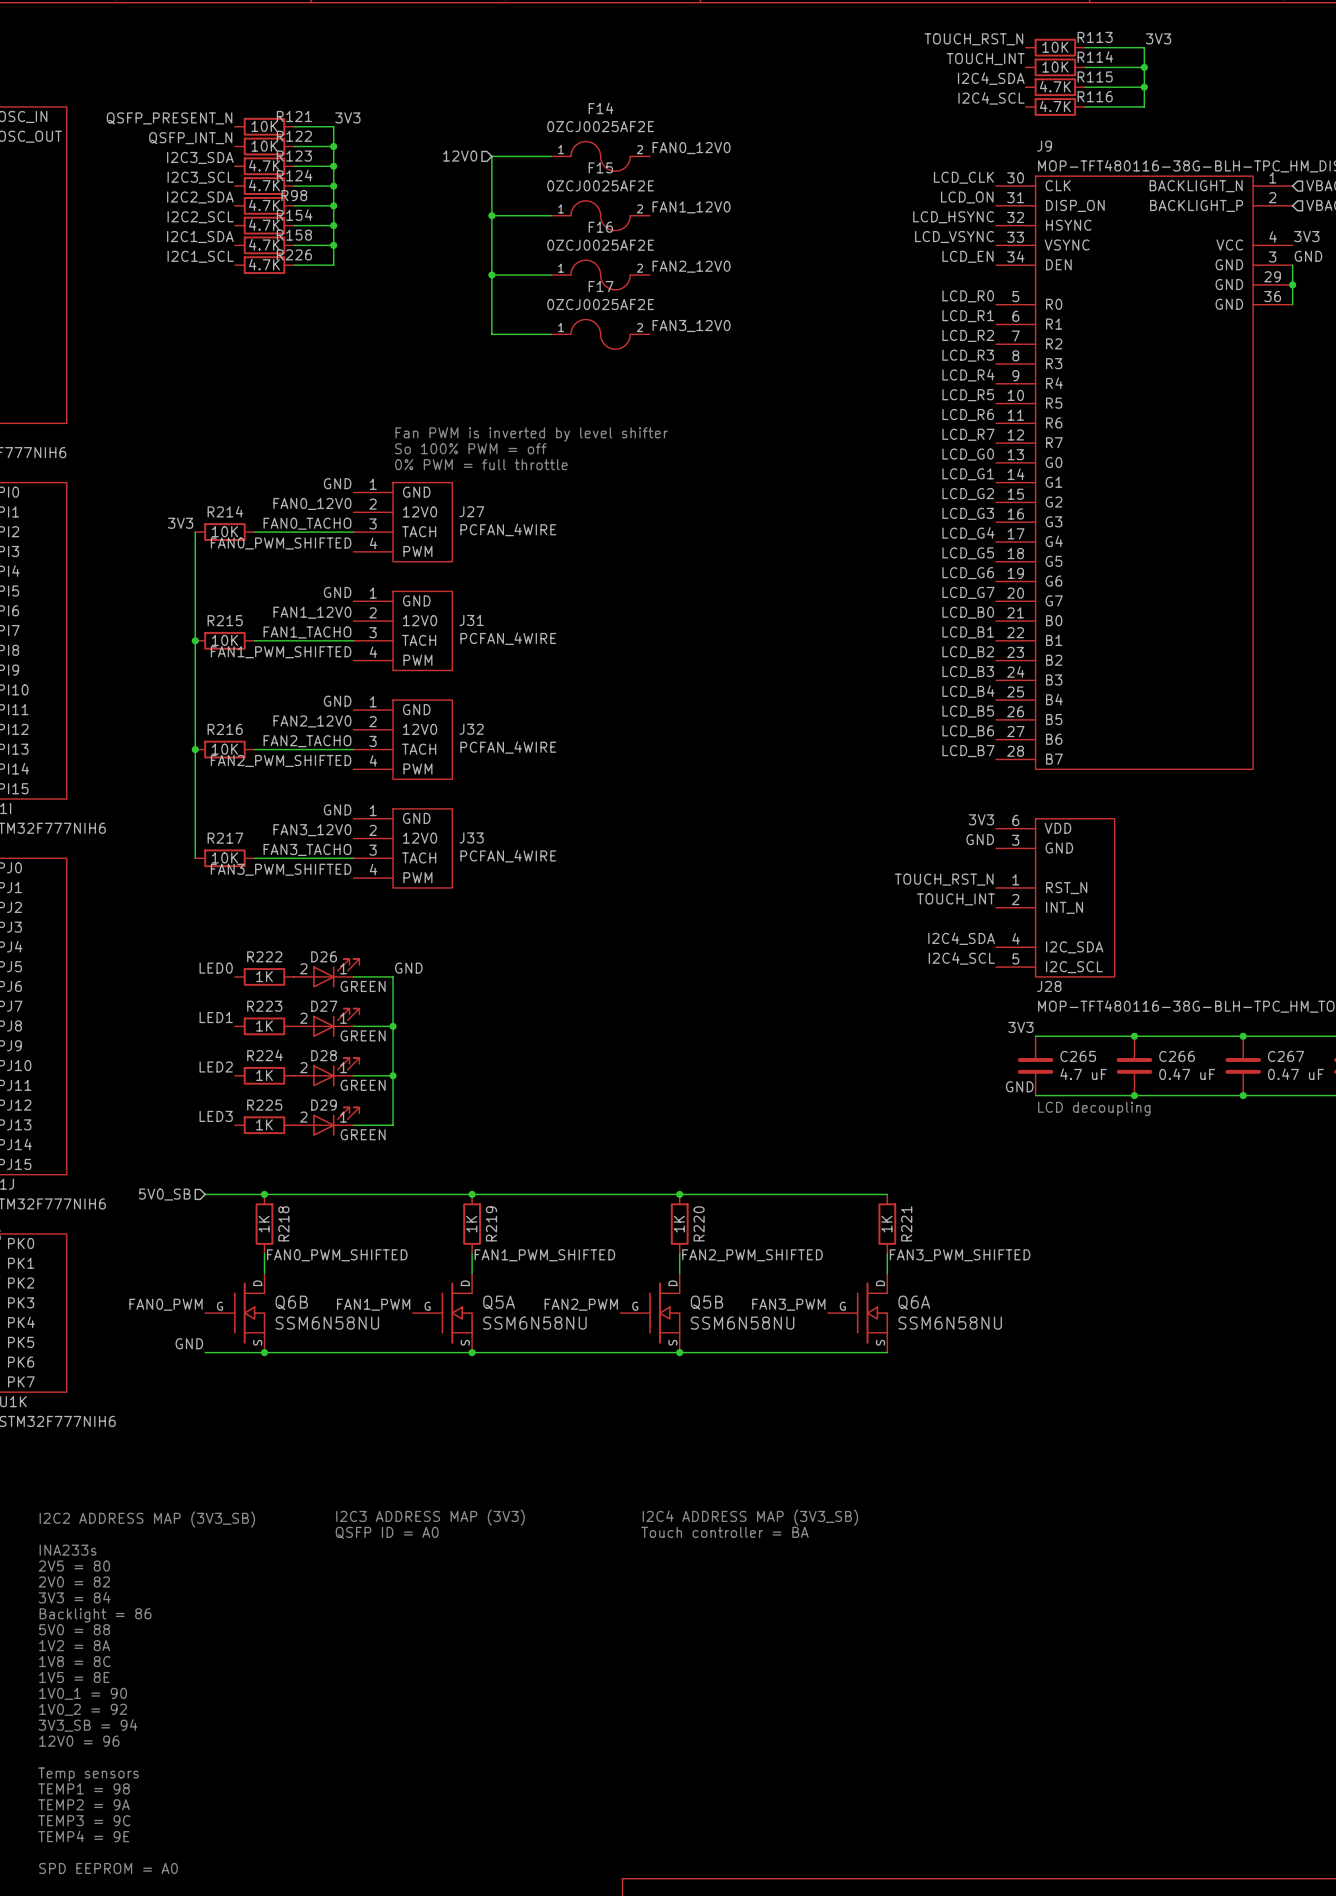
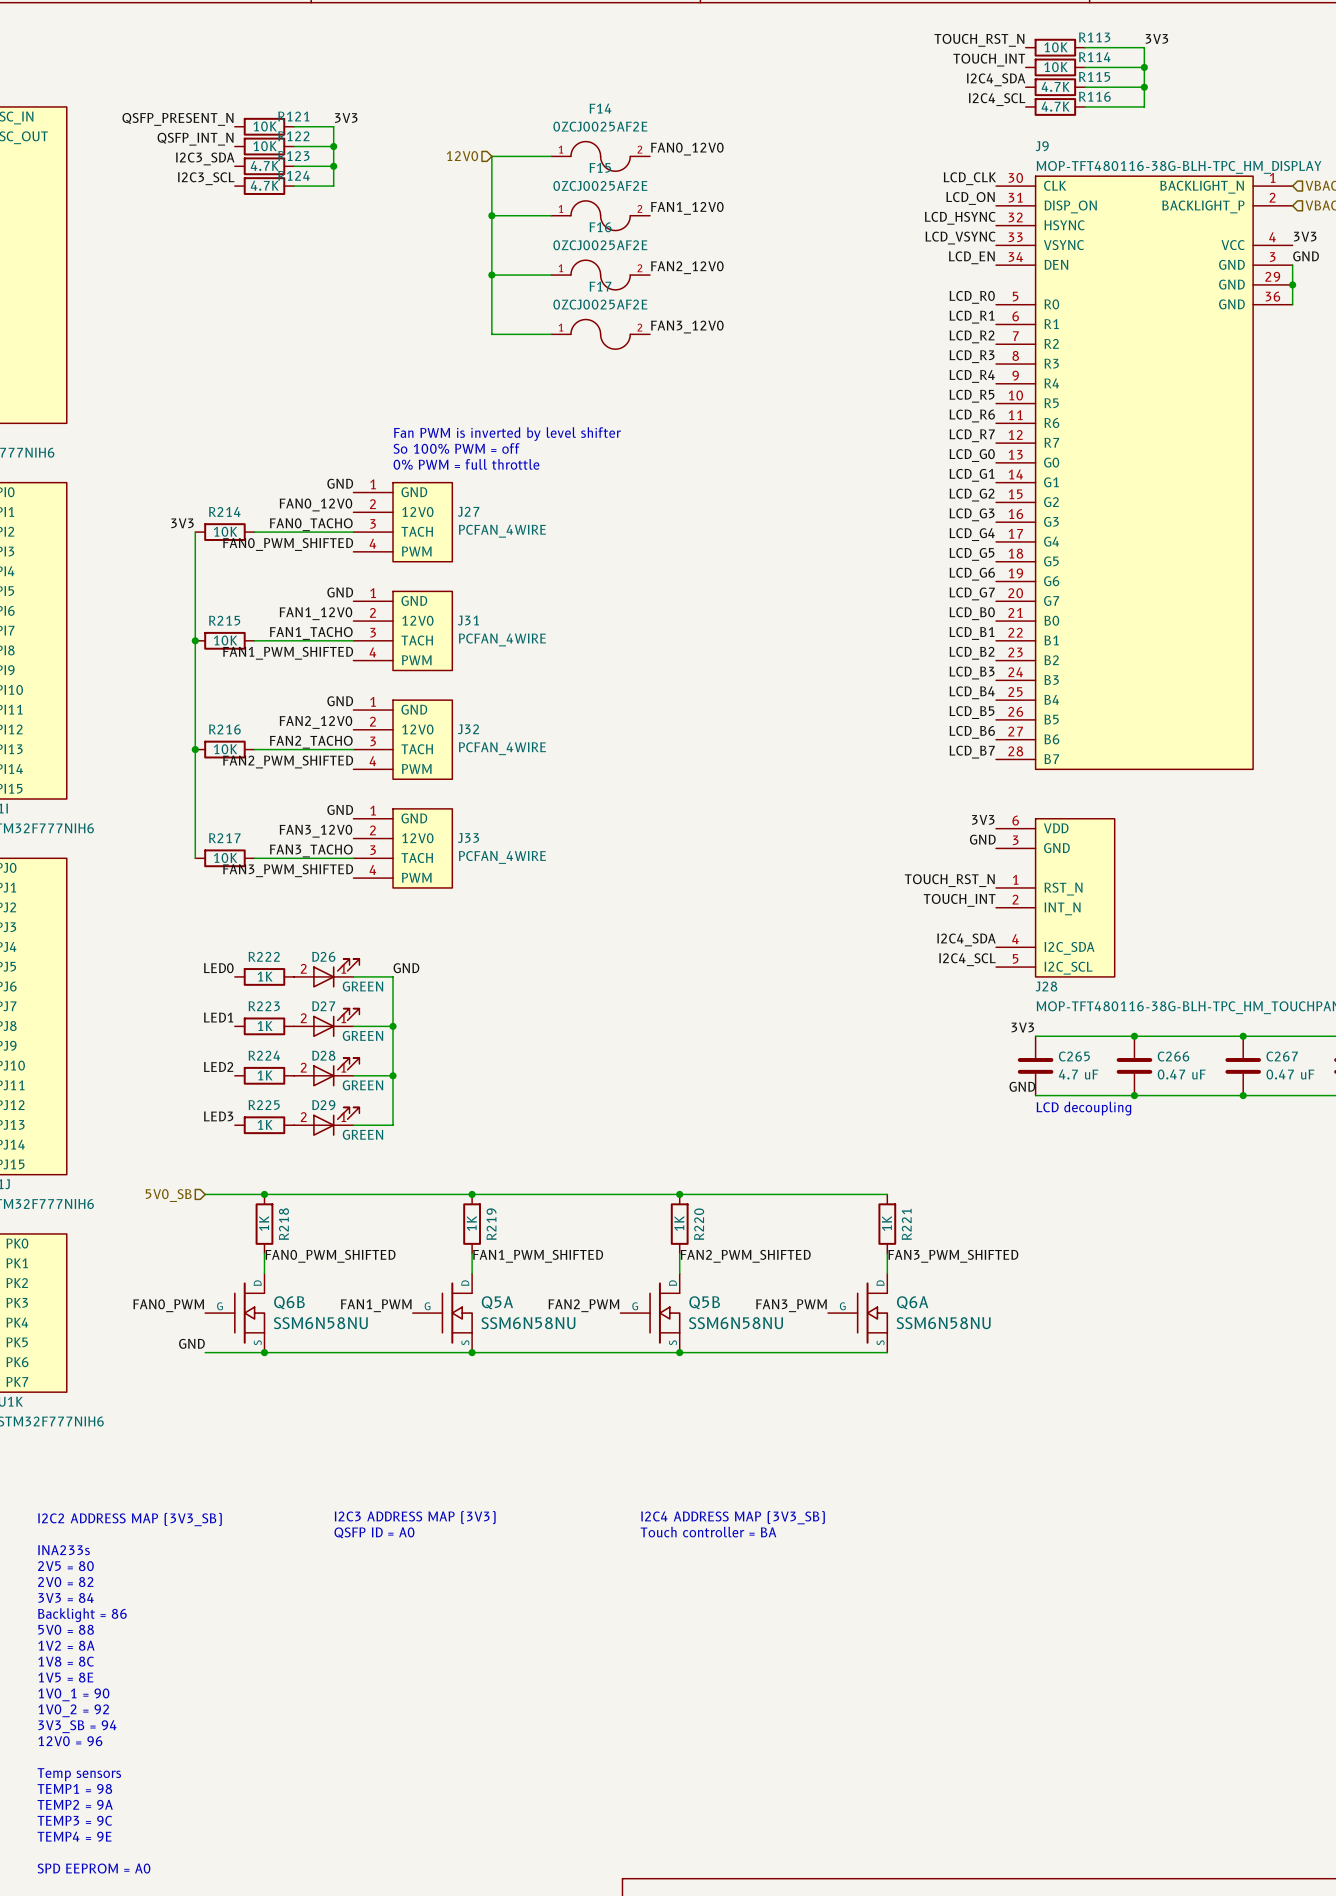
wire: (333, 186) (333, 265) (294, 265) -> none
junction: (333, 186) -> none
label: I2C2_SDA (200, 197) -> none
R98: 4.7K (264, 205) -> none
wire: (294, 205) (333, 205) -> none
junction: (333, 205) -> none
label: I2C2_SCL (200, 217) -> none
R154: 4.7K (264, 225) -> none
wire: (294, 225) (333, 225) -> none
junction: (333, 225) -> none
label: I2C1_SDA (200, 237) -> none
R158: 4.7K (264, 245) -> none
wire: (294, 245) (333, 245) -> none
junction: (333, 245) -> none
label: I2C1_SCL (200, 256) -> none
R226: 4.7K (264, 265) -> none

